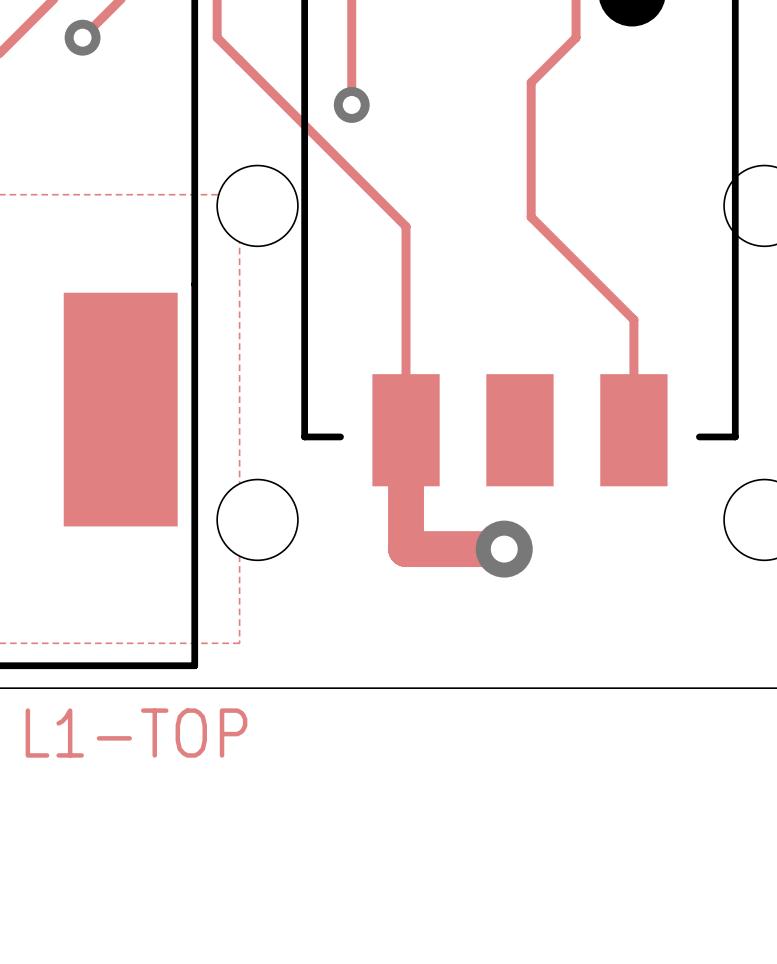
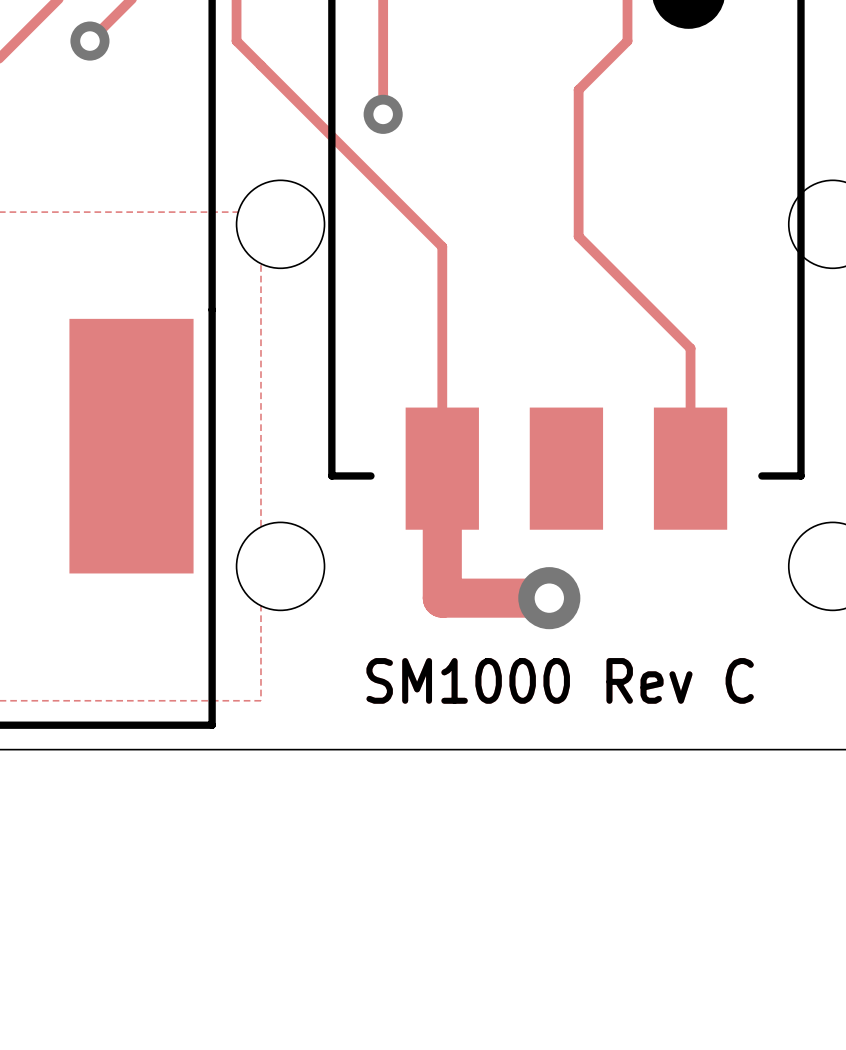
text: none -> SM1000 Rev C (560, 680)
text: L1-TOP (136, 733) -> none

